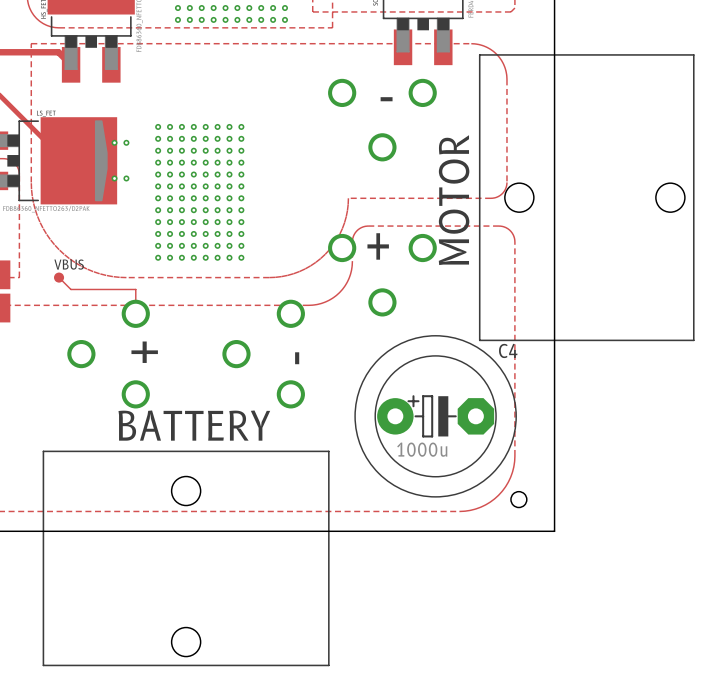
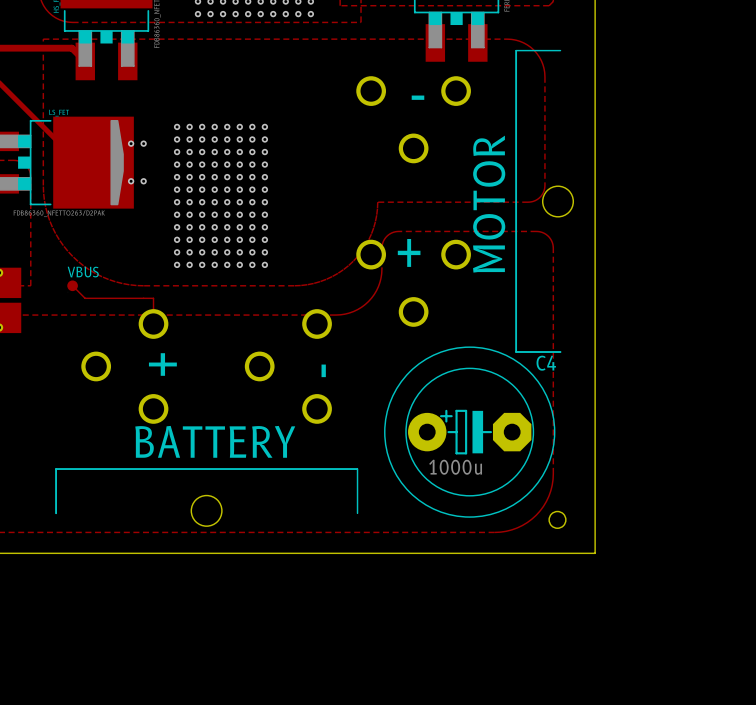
MOTOR: none -> (464, 201)
MOTOR: (511, 197) -> none
BATTERY: none -> (206, 417)
BATTERY: (186, 482) -> none

